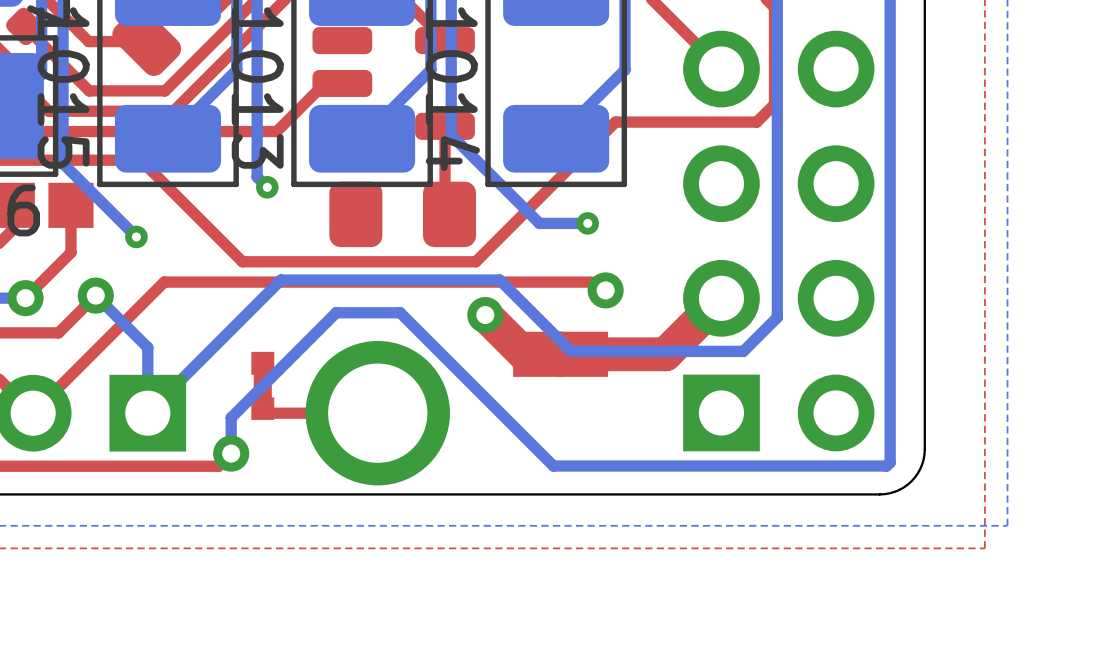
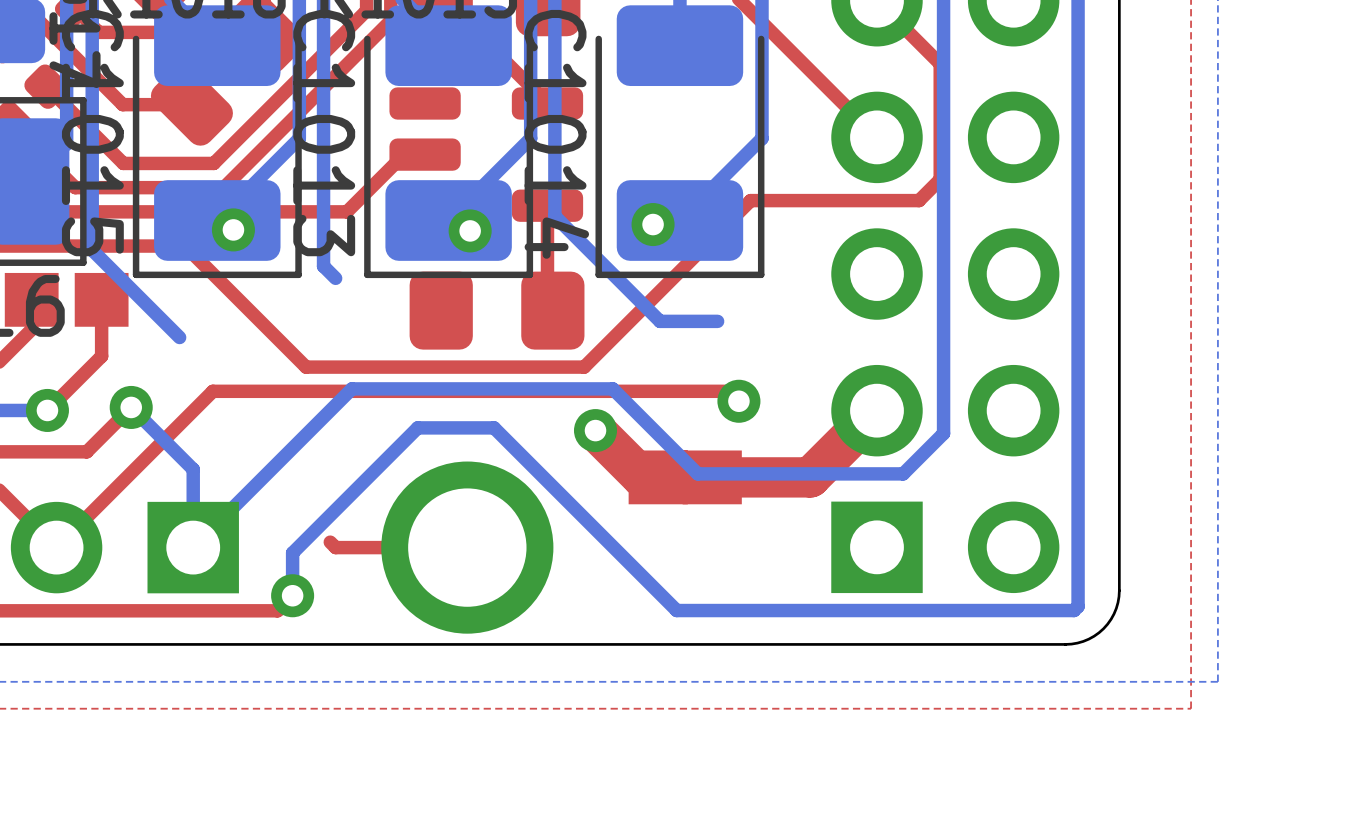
via: none -> (653, 224)
via: none -> (233, 229)
via: none -> (470, 230)
part: (267, 187) -> none
part: (587, 223) -> none
part: (136, 236) -> none
part: (262, 385) -> none

